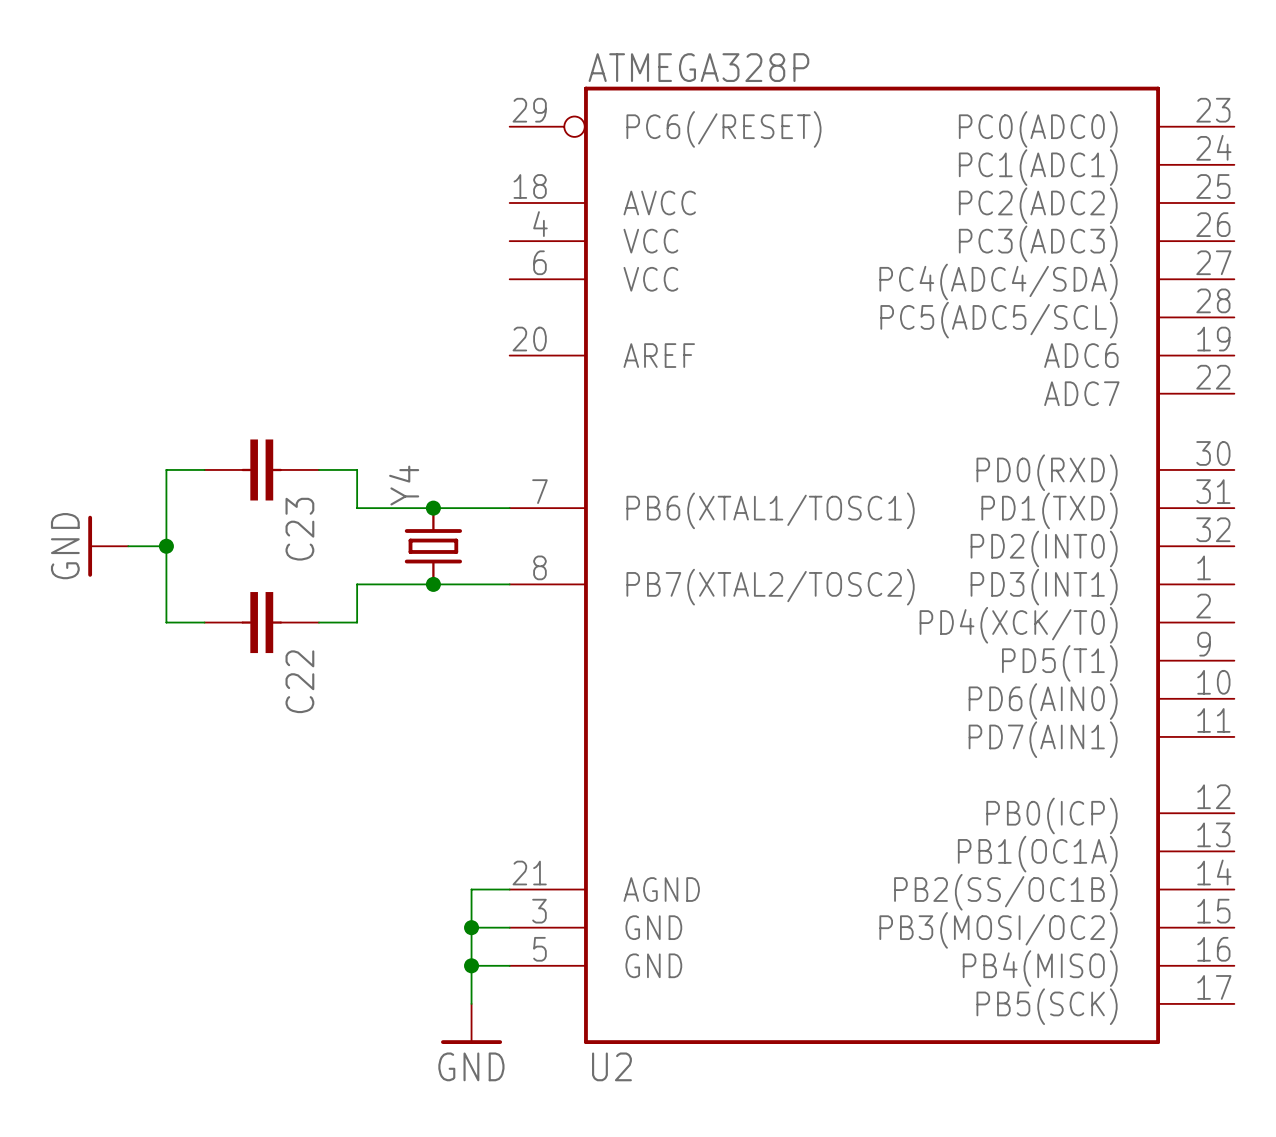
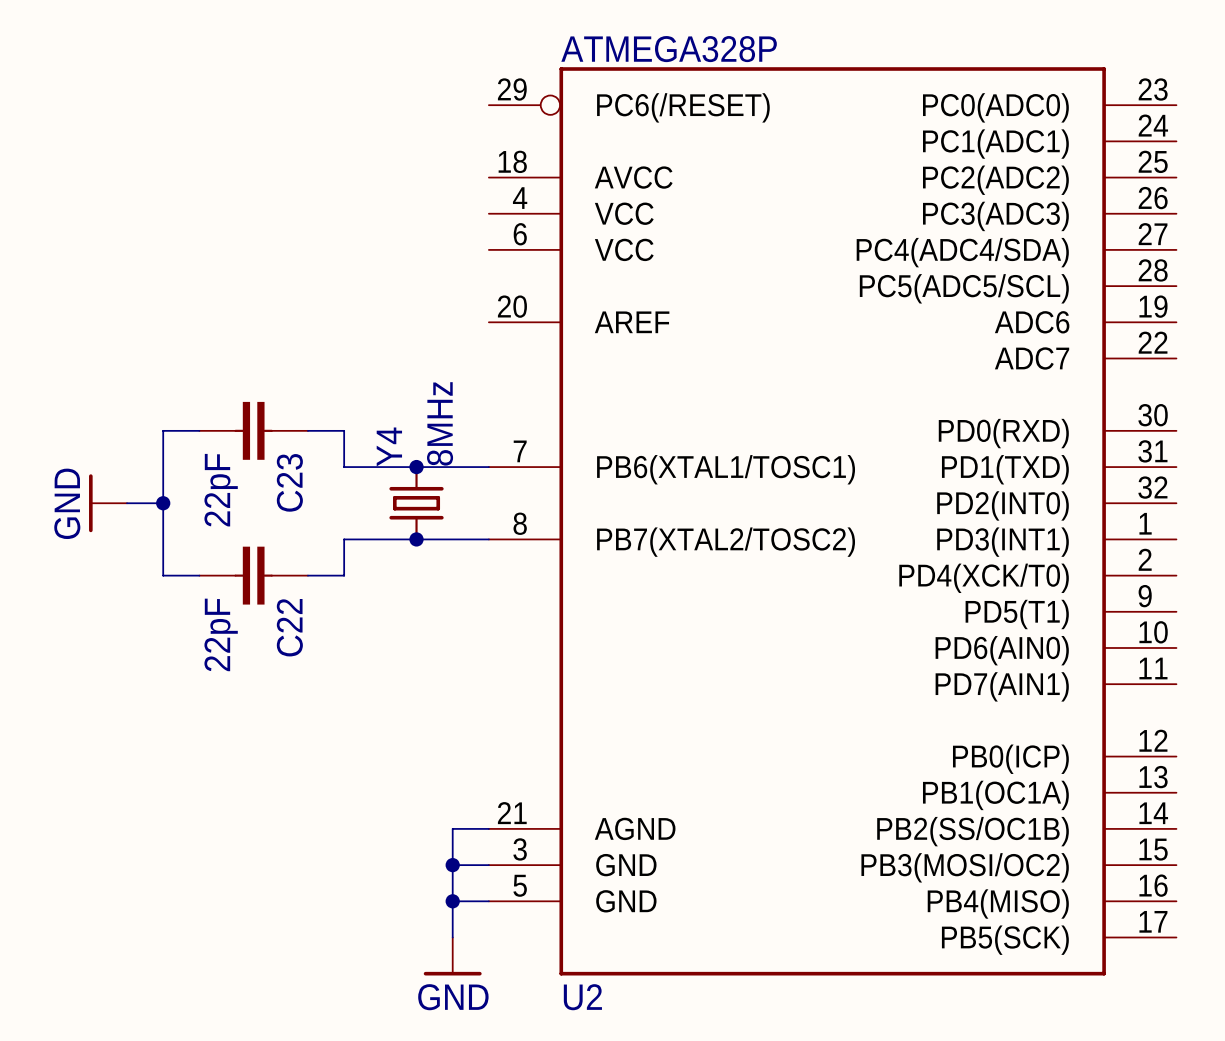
Y4 value: none -> 8MHz (440, 423)
C23 value: none -> 22pF (221, 490)
C22 value: none -> 22pF (221, 634)

